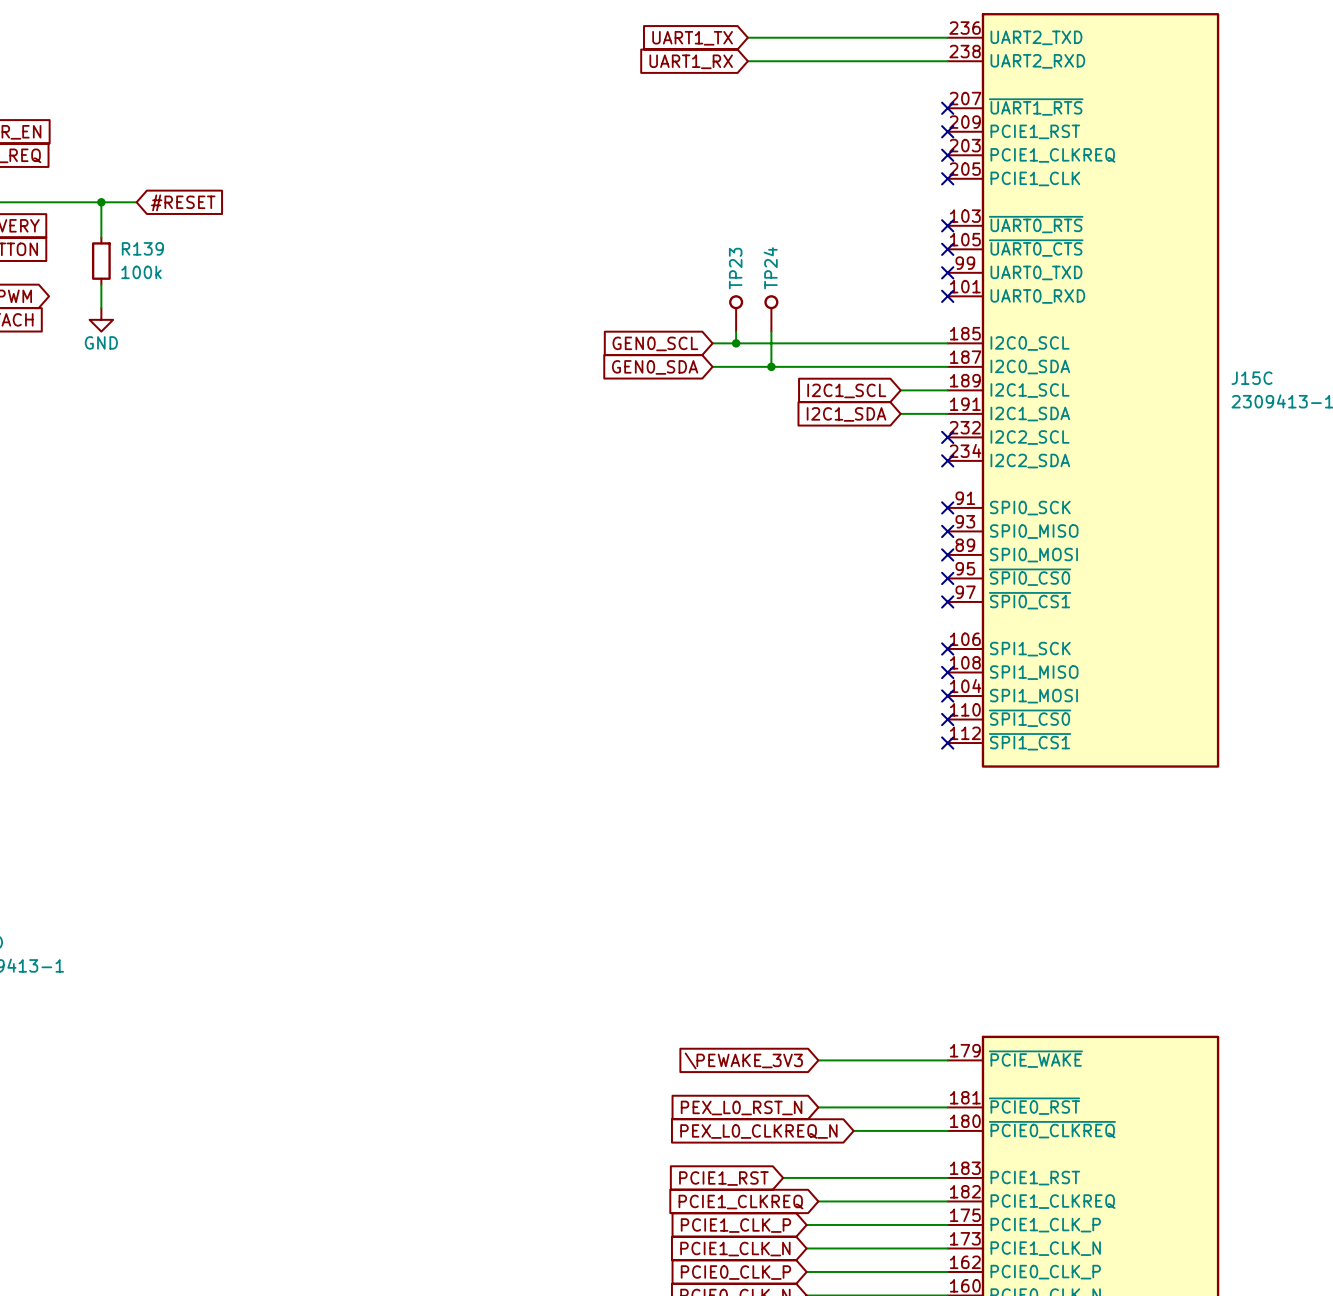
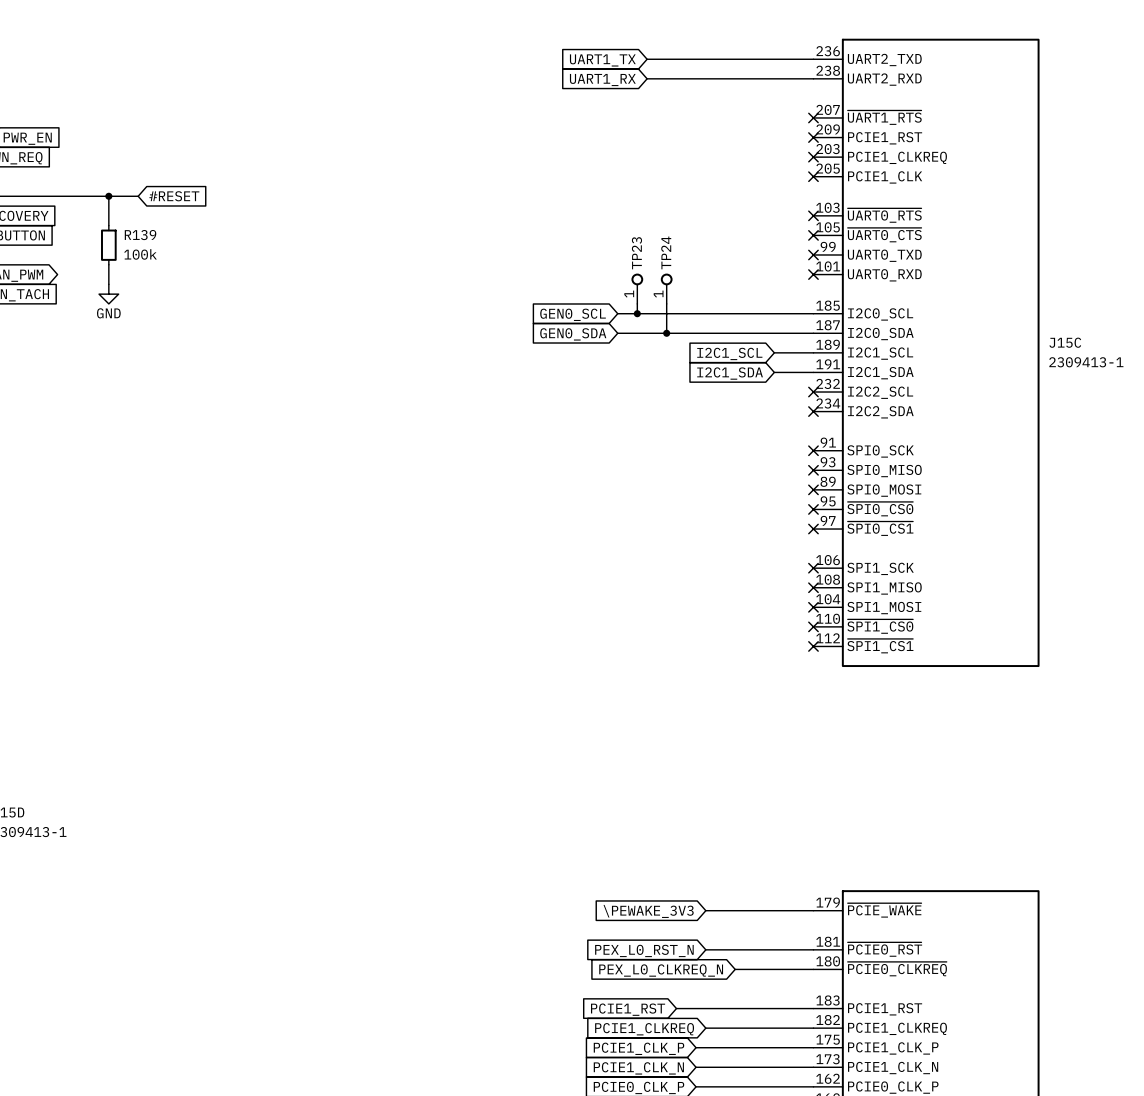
TP23 pin number: none -> 1 (629, 294)
TP24 pin number: none -> 1 (658, 294)

